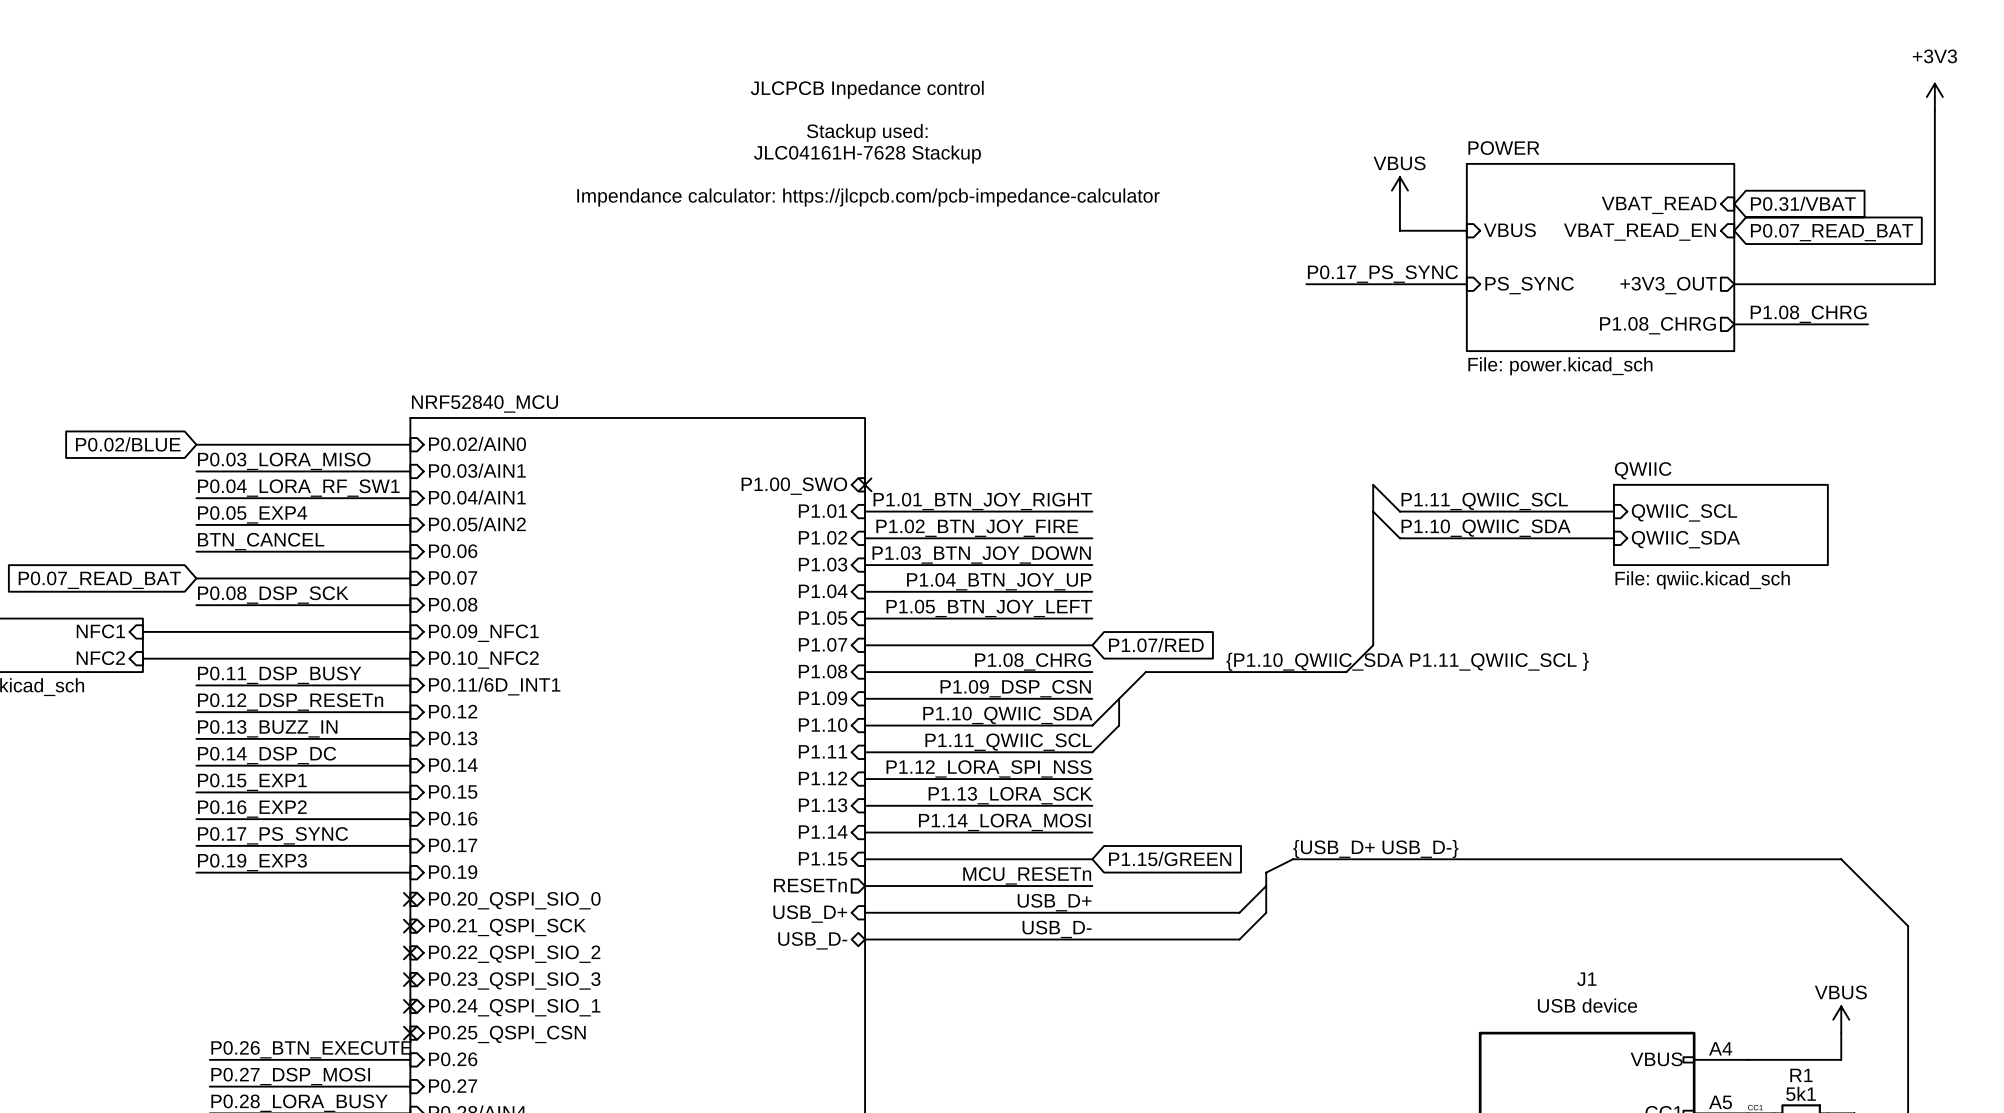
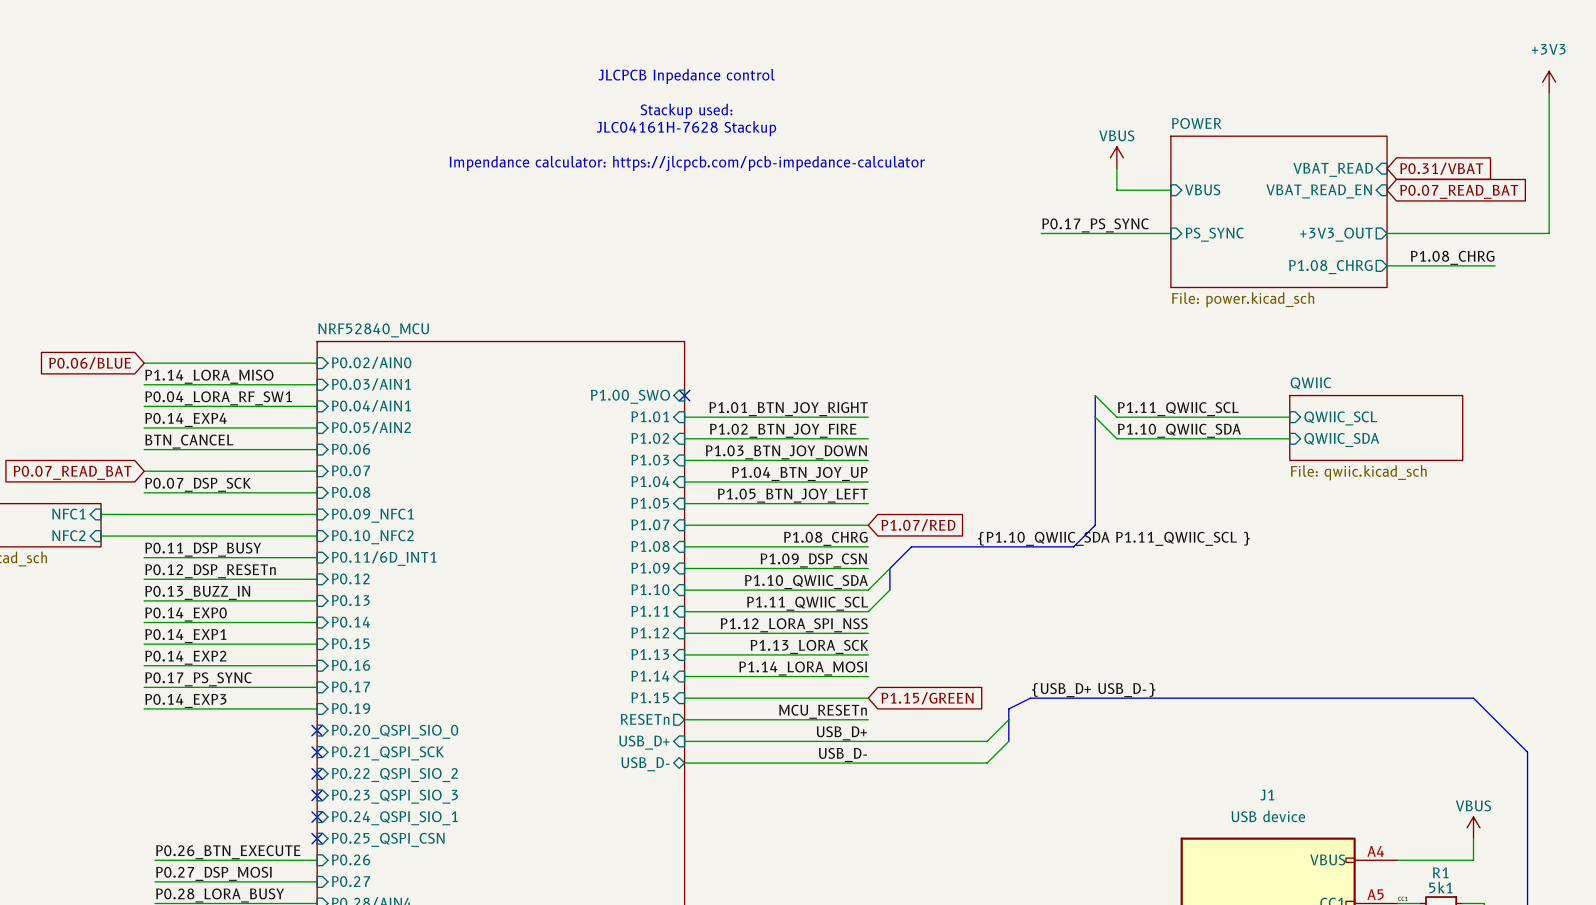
global label: P0.02/BLUE (128, 444) -> P0.06/BLUE (90, 363)
label: P0.03_LORA_MISO (284, 461) -> P1.14_LORA_MISO (209, 376)
label: P0.05_EXP4 (252, 514) -> P0.14_EXP4 (186, 419)
label: P0.08_DSP_SCK (273, 595) -> P0.07_DSP_SCK (198, 484)
label: P0.14_DSP_DC (267, 755) -> P0.14_EXP0 (186, 614)
label: P0.15_EXP1 (252, 782) -> P0.14_EXP1 (185, 636)
label: P0.16_EXP2 (252, 809) -> P0.14_EXP2 (185, 657)
label: P0.19_EXP3 (252, 862) -> P0.14_EXP3 (185, 700)

